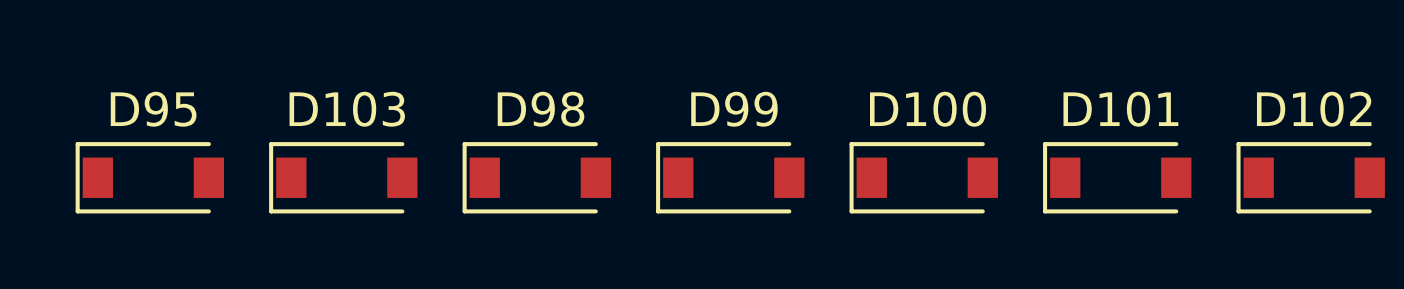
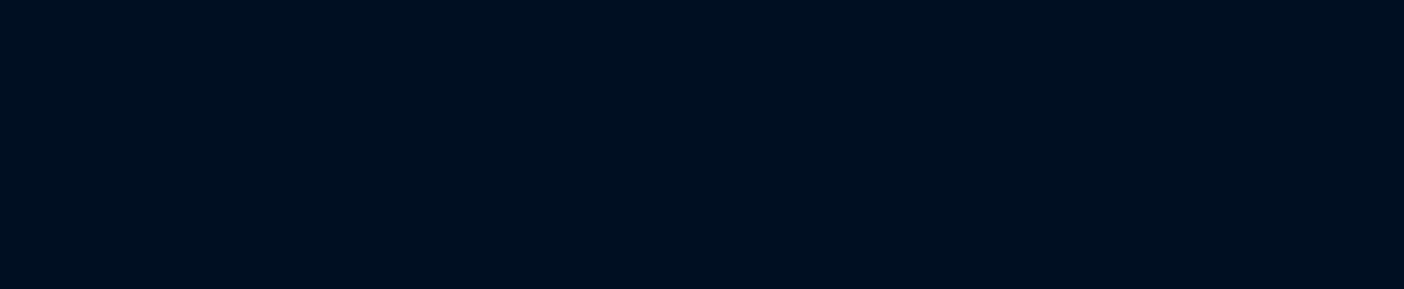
D95: (149, 177) -> none
D103: (343, 177) -> none
D98: (536, 177) -> none
D99: (730, 177) -> none
D100: (923, 177) -> none
D101: (1117, 177) -> none
D102: (1310, 177) -> none

